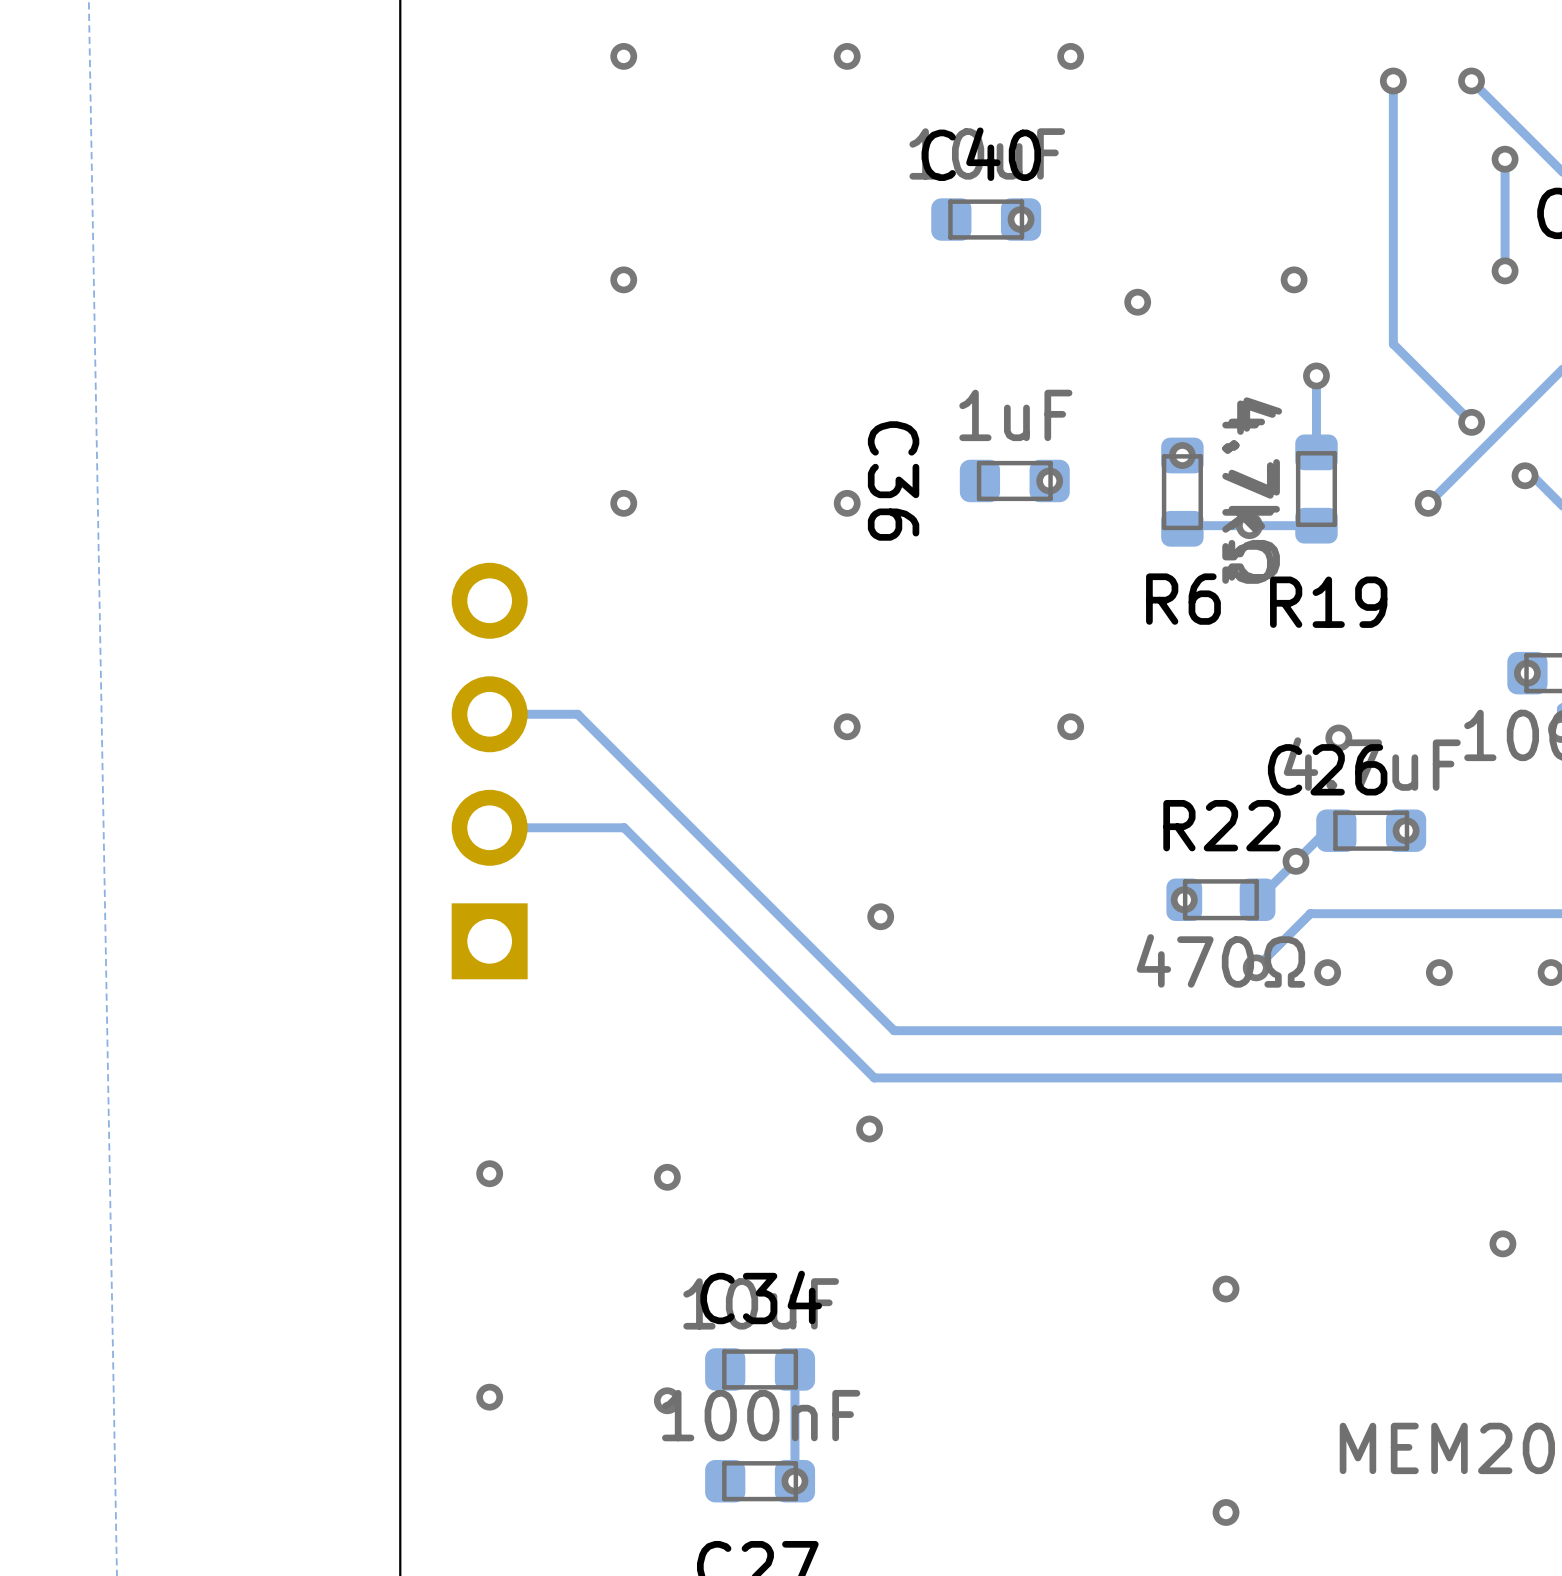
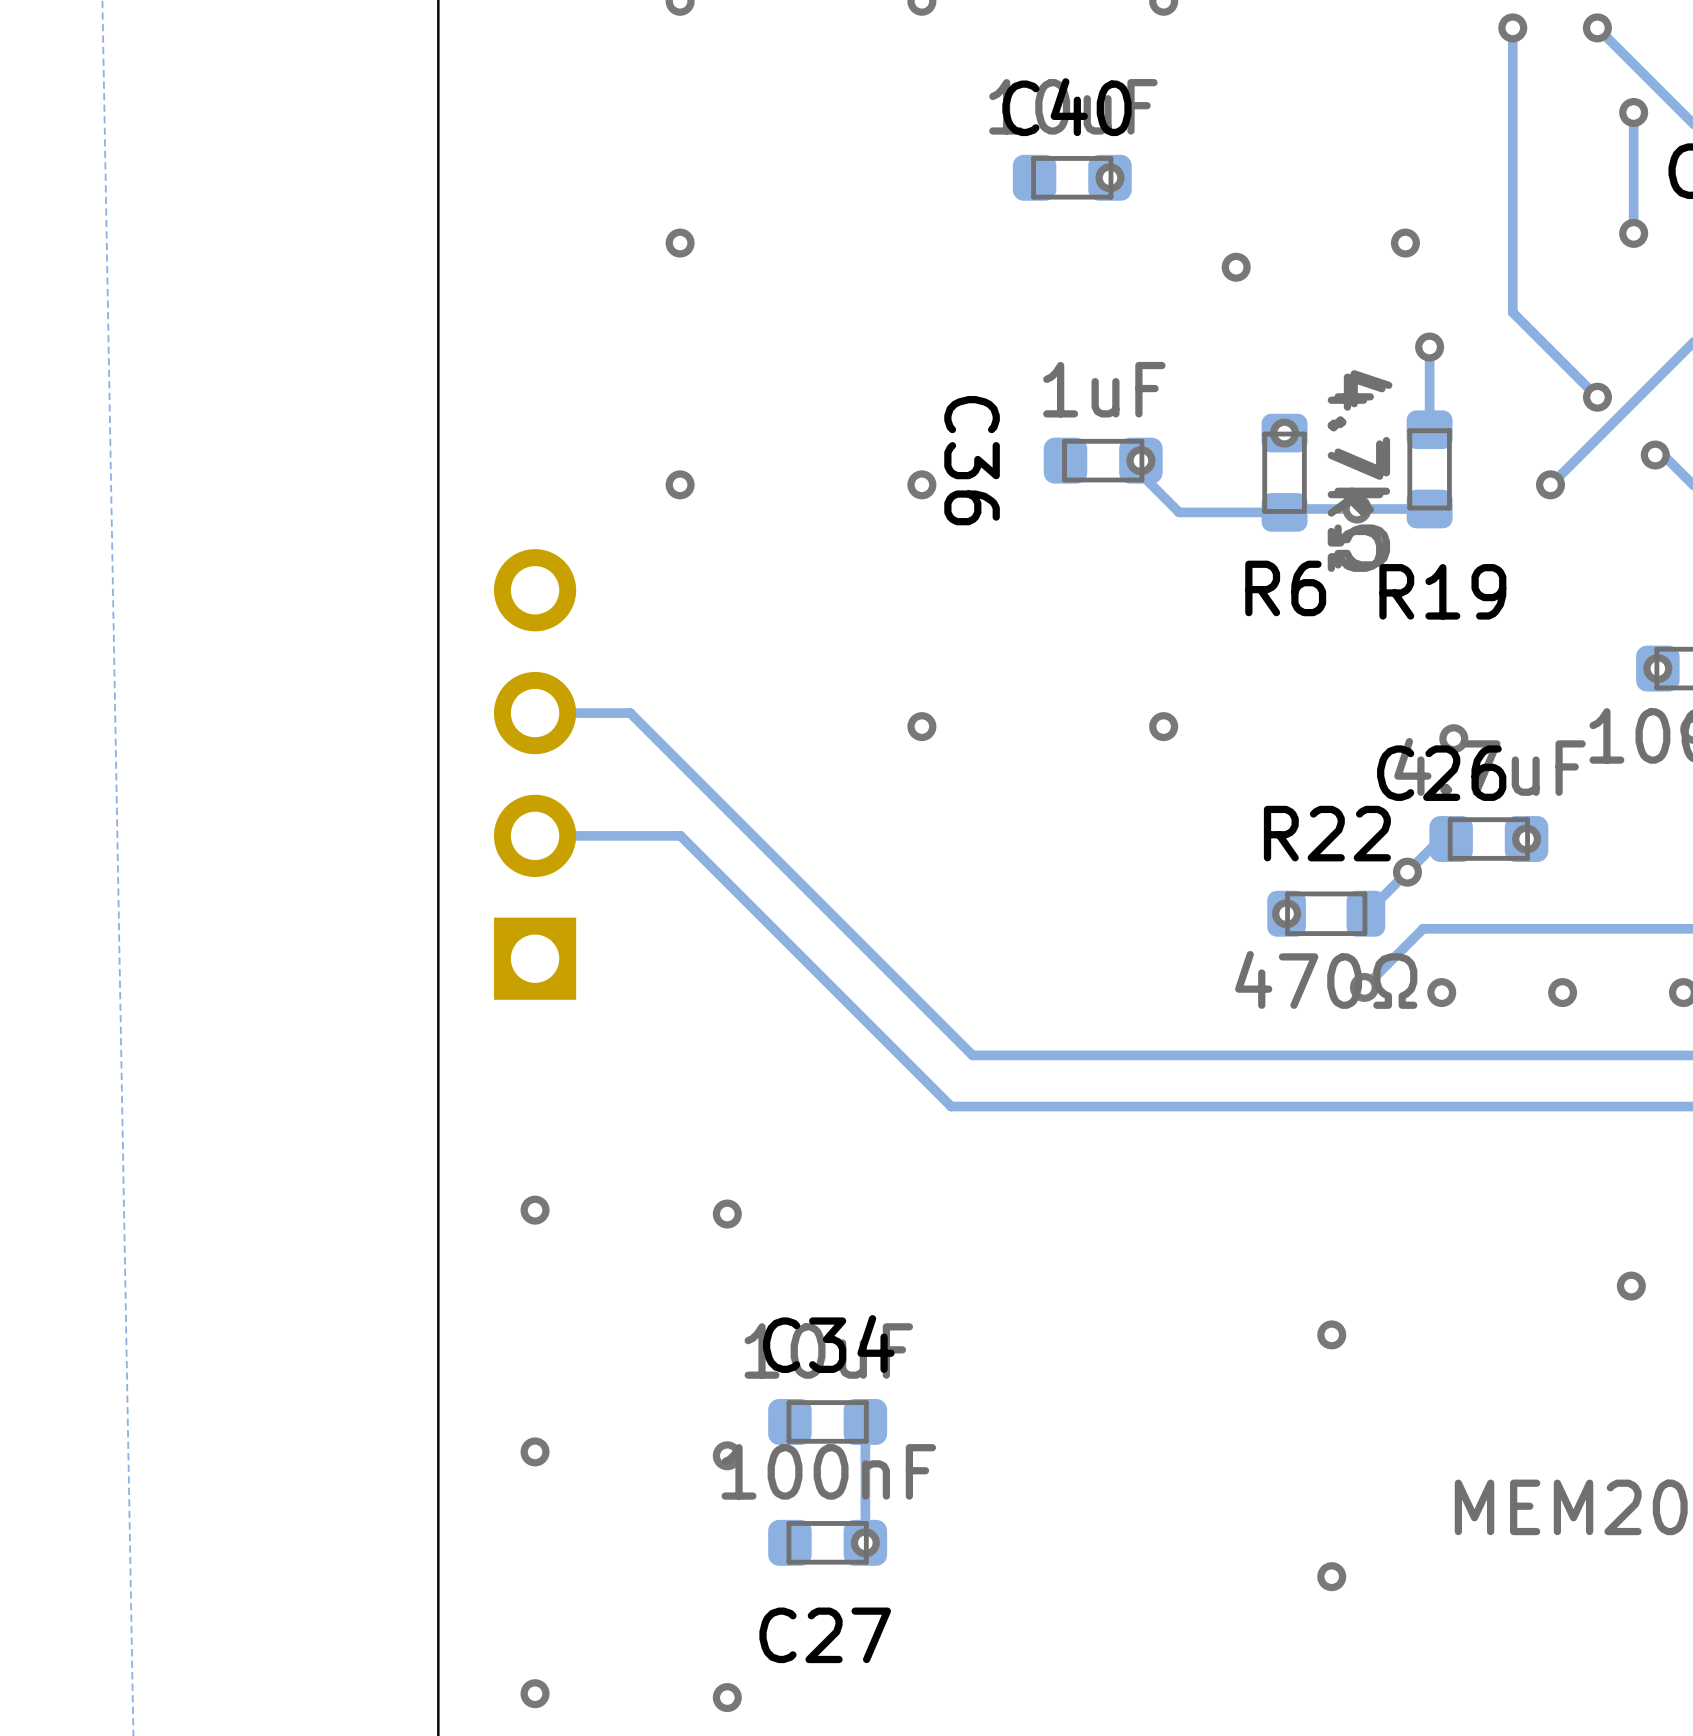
track: none -> (1140, 460) (1140, 474) (1179, 512) (1284, 512)
via: (880, 916) -> none
via: (869, 1129) -> none

